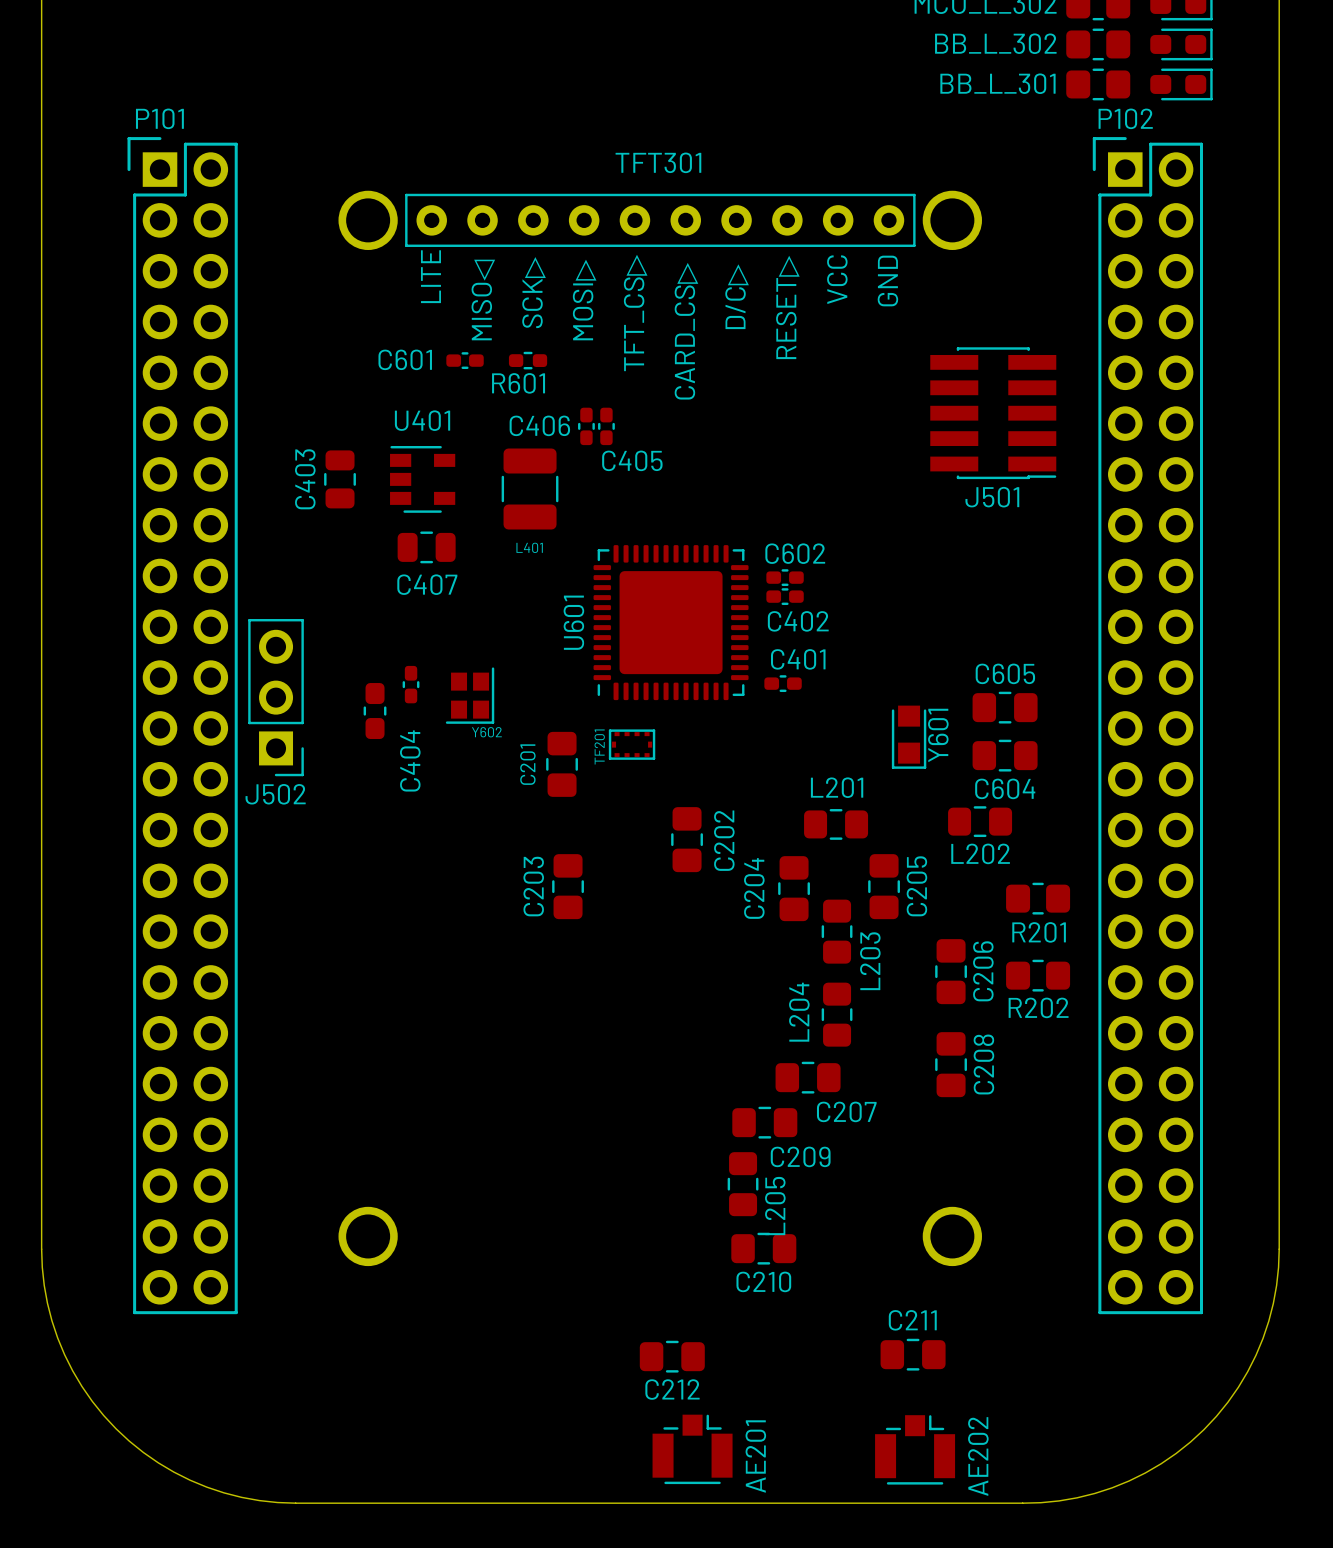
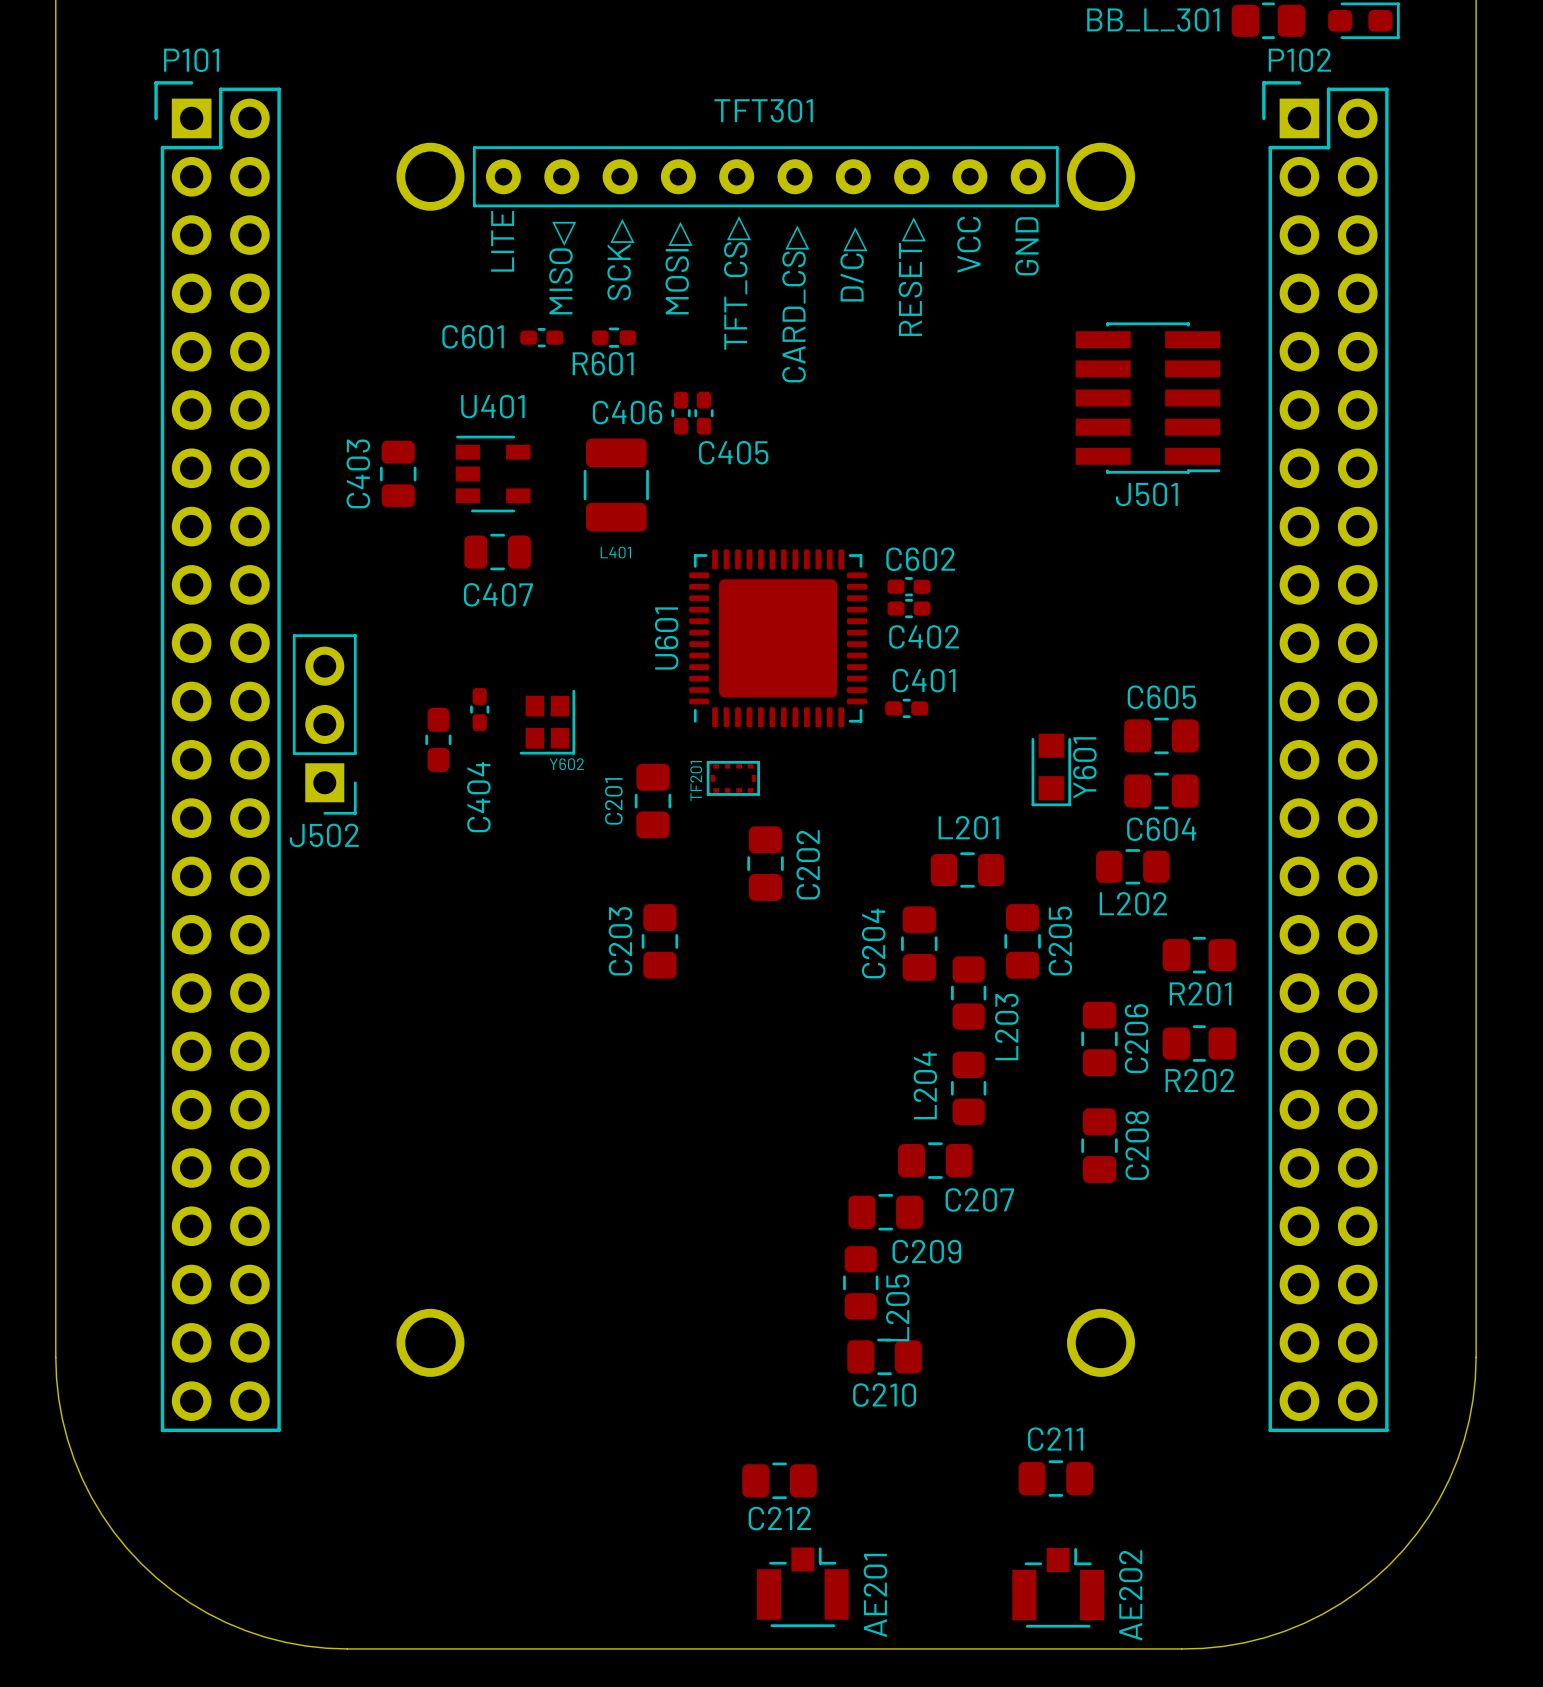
C202 position: (687, 839) -> (765, 863)

